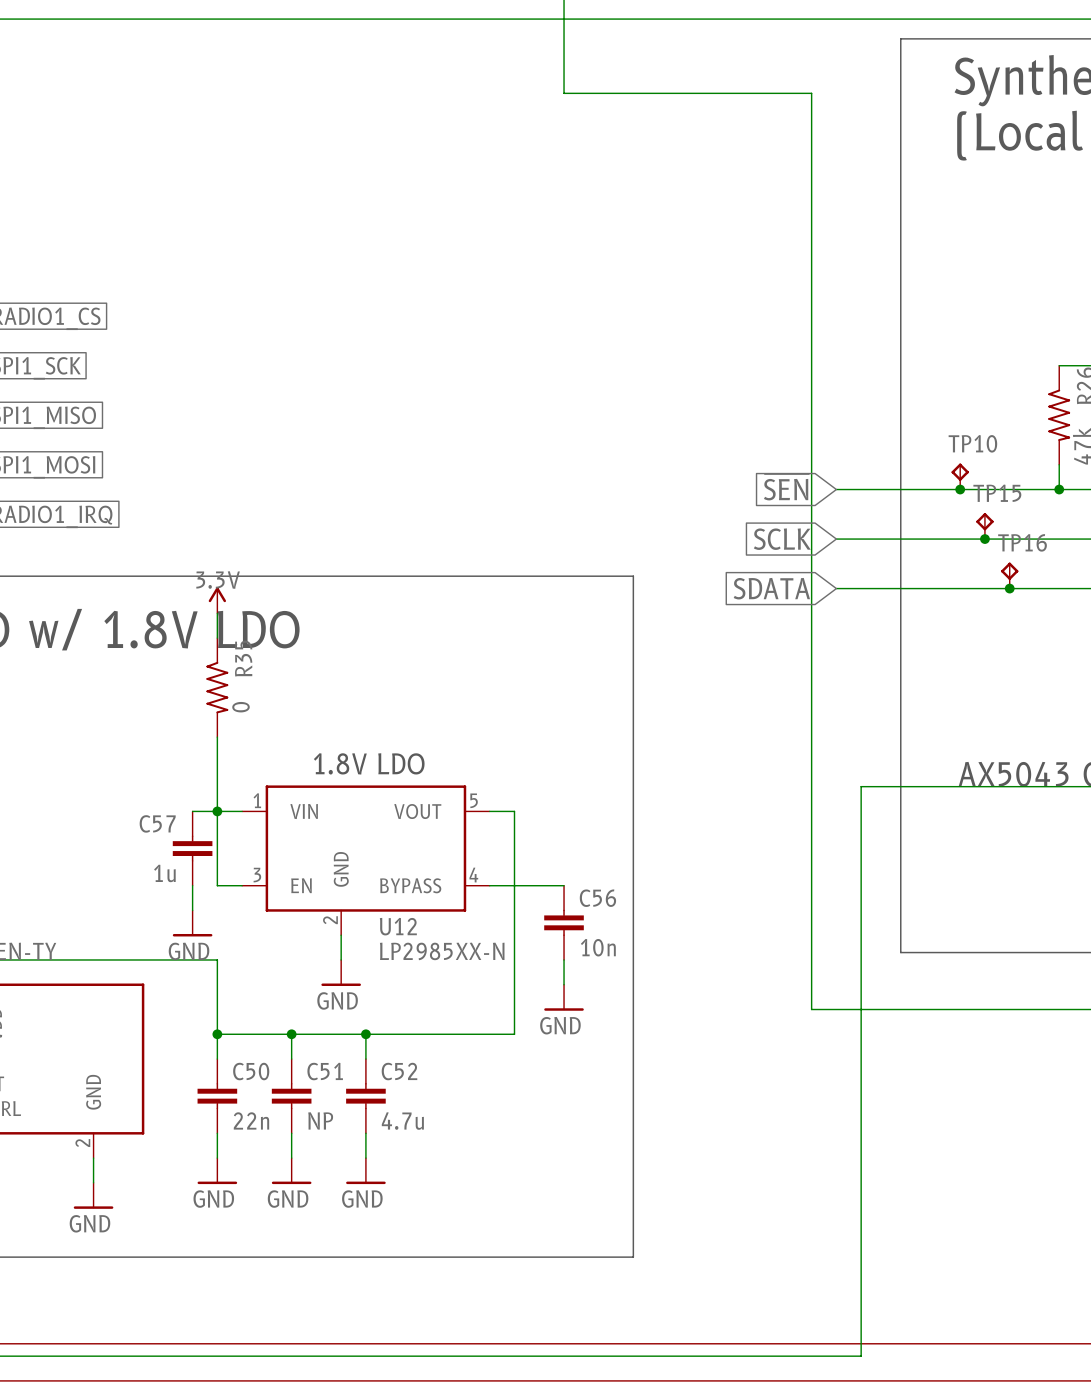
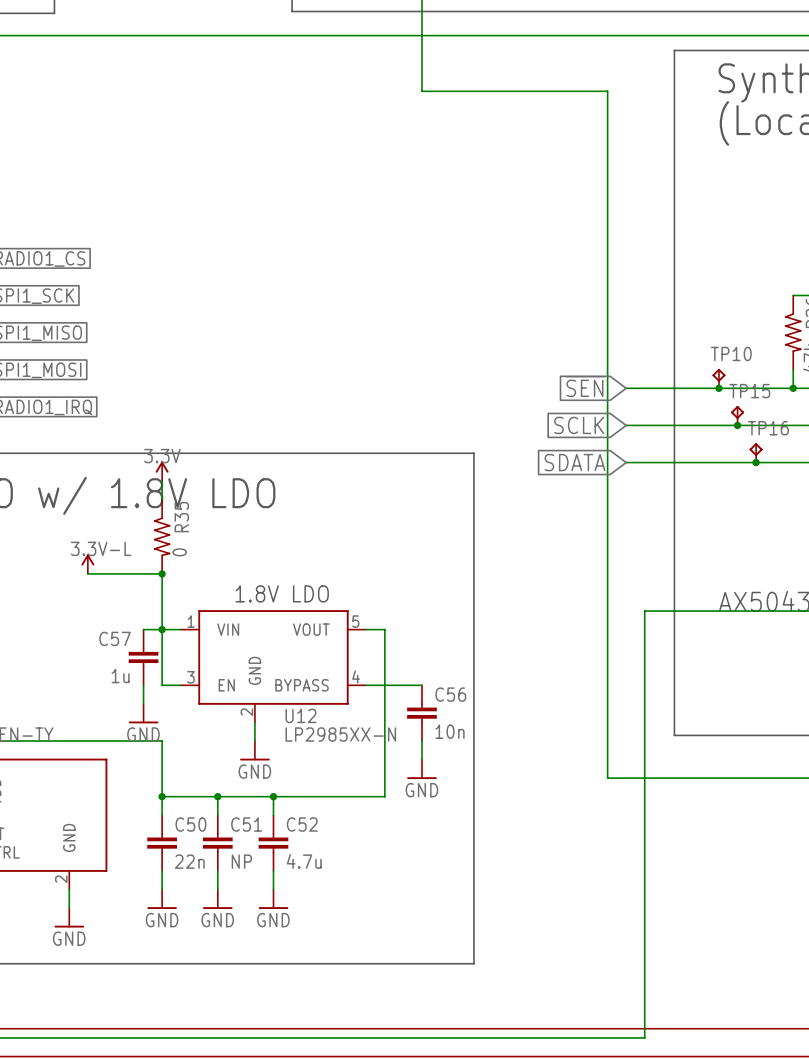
power symbol: none -> 3.3V-L (87, 564)
wire: none -> (87, 573) (162, 573)
junction: none -> (162, 573)

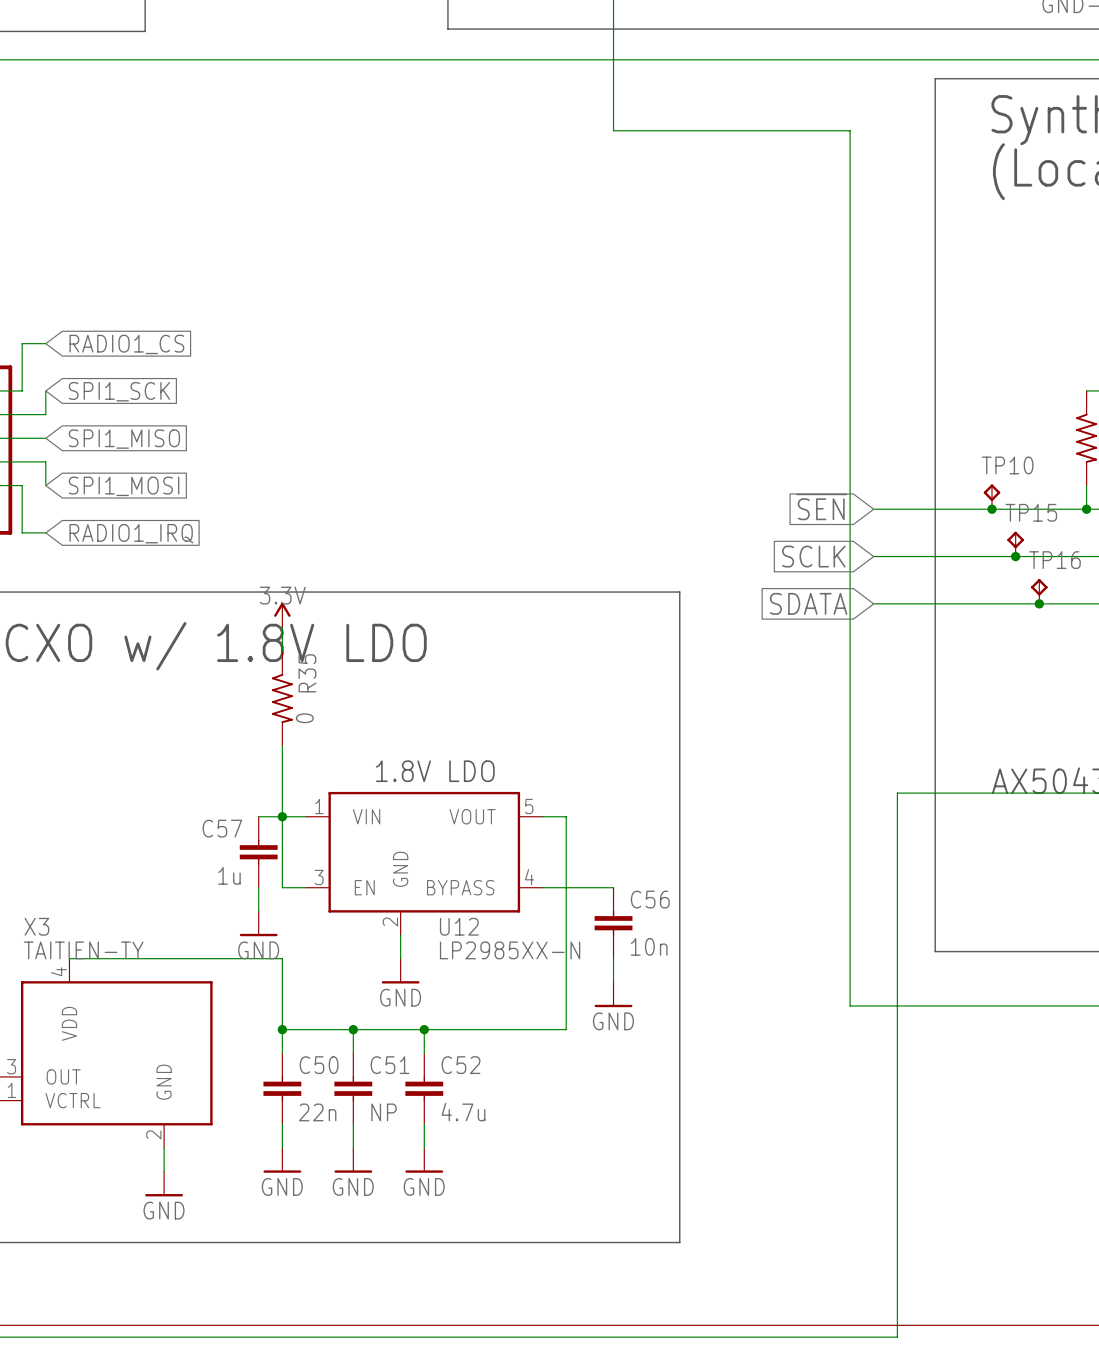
power symbol: 3.3V-L (87, 564) -> none
wire: (87, 573) (162, 573) -> none
junction: (162, 573) -> none

